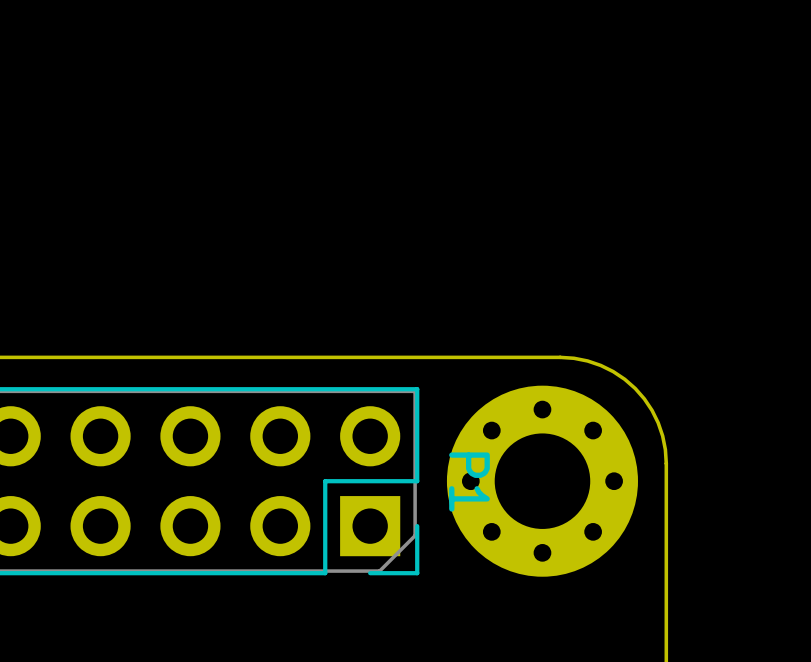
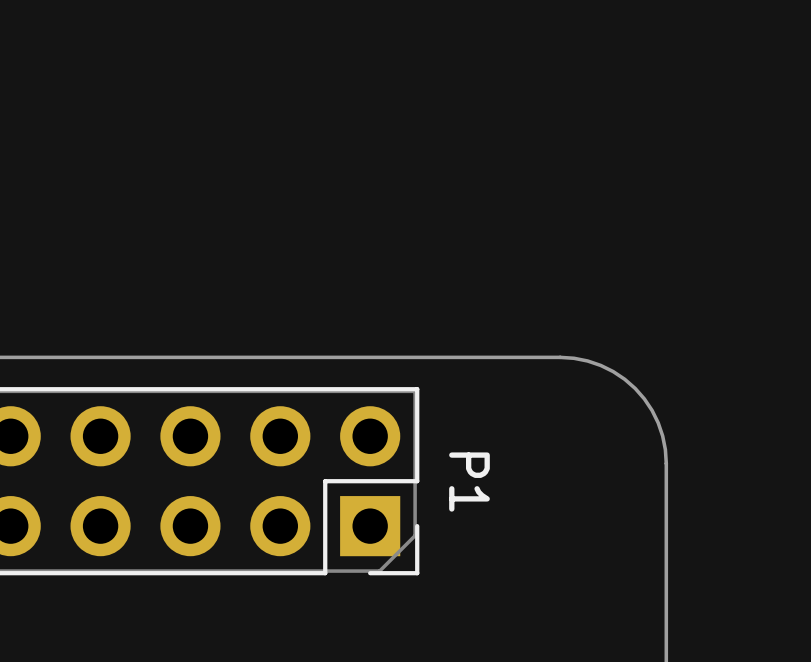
part: (542, 481) -> none

